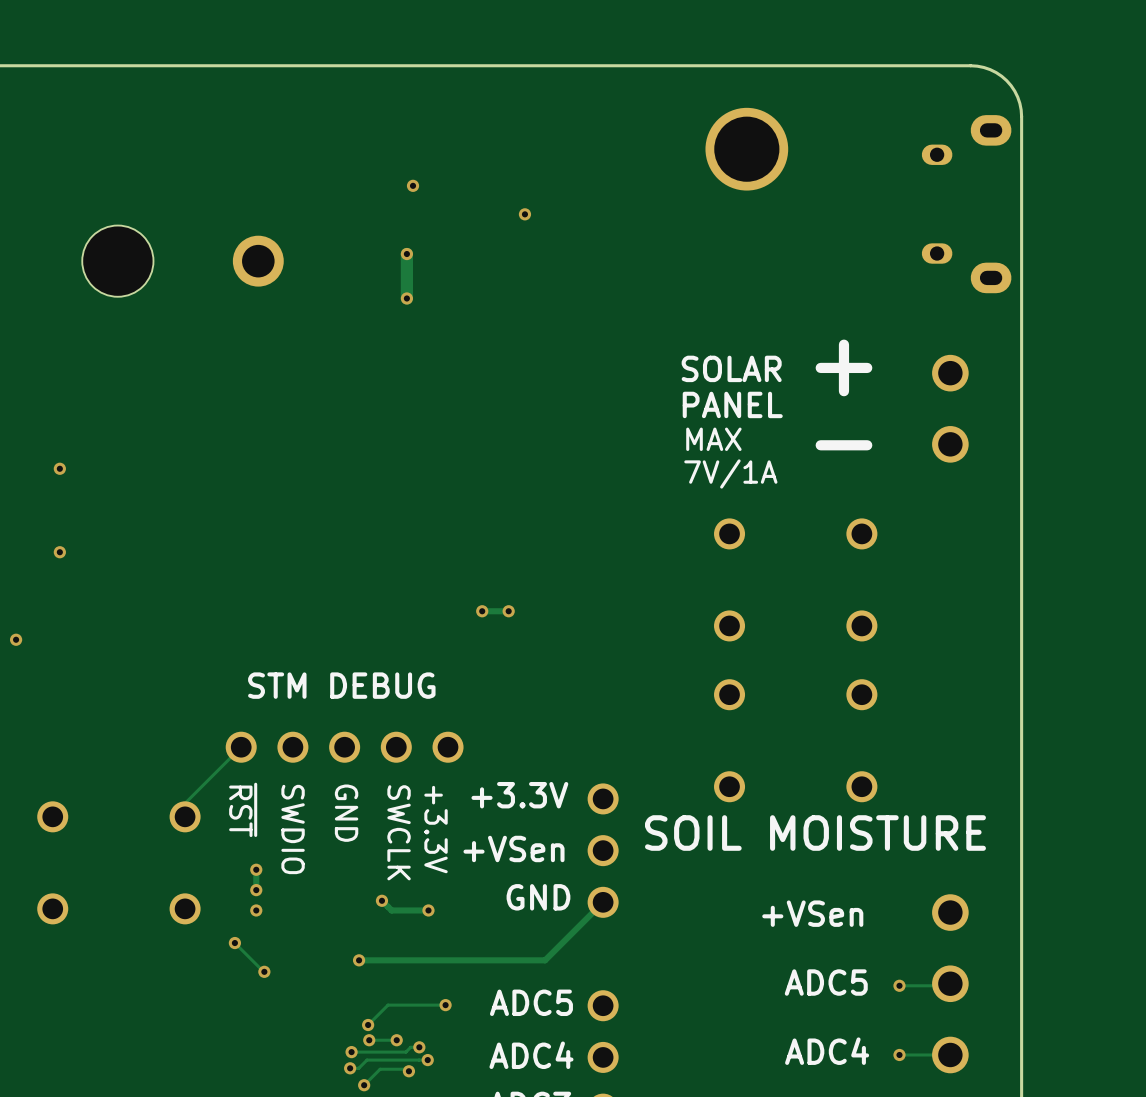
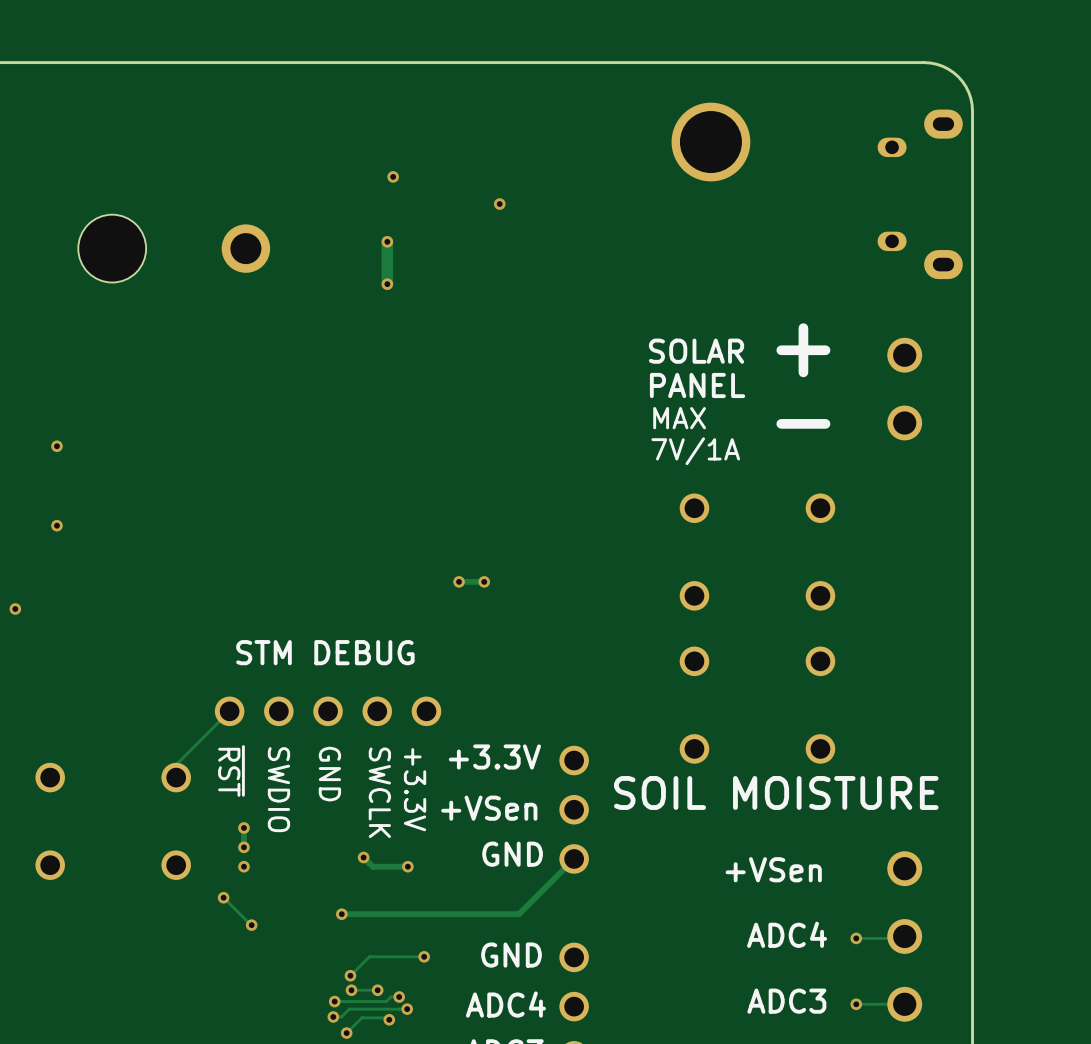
text: ADC5 (826, 982) -> ADC4 (787, 934)
text: ADC5 (531, 1002) -> GND (511, 955)
text: ADC4 (827, 1051) -> ADC3 (786, 1001)

